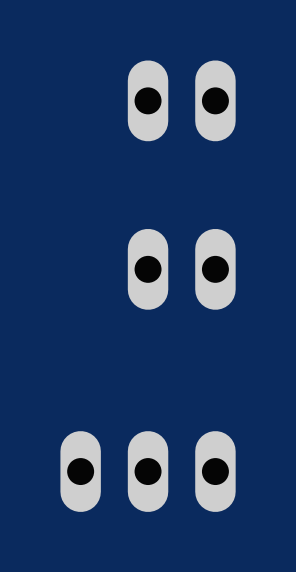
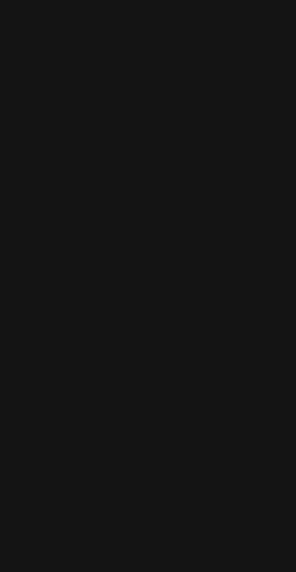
part: (181, 100) -> none
part: (181, 269) -> none
part: (148, 471) -> none

